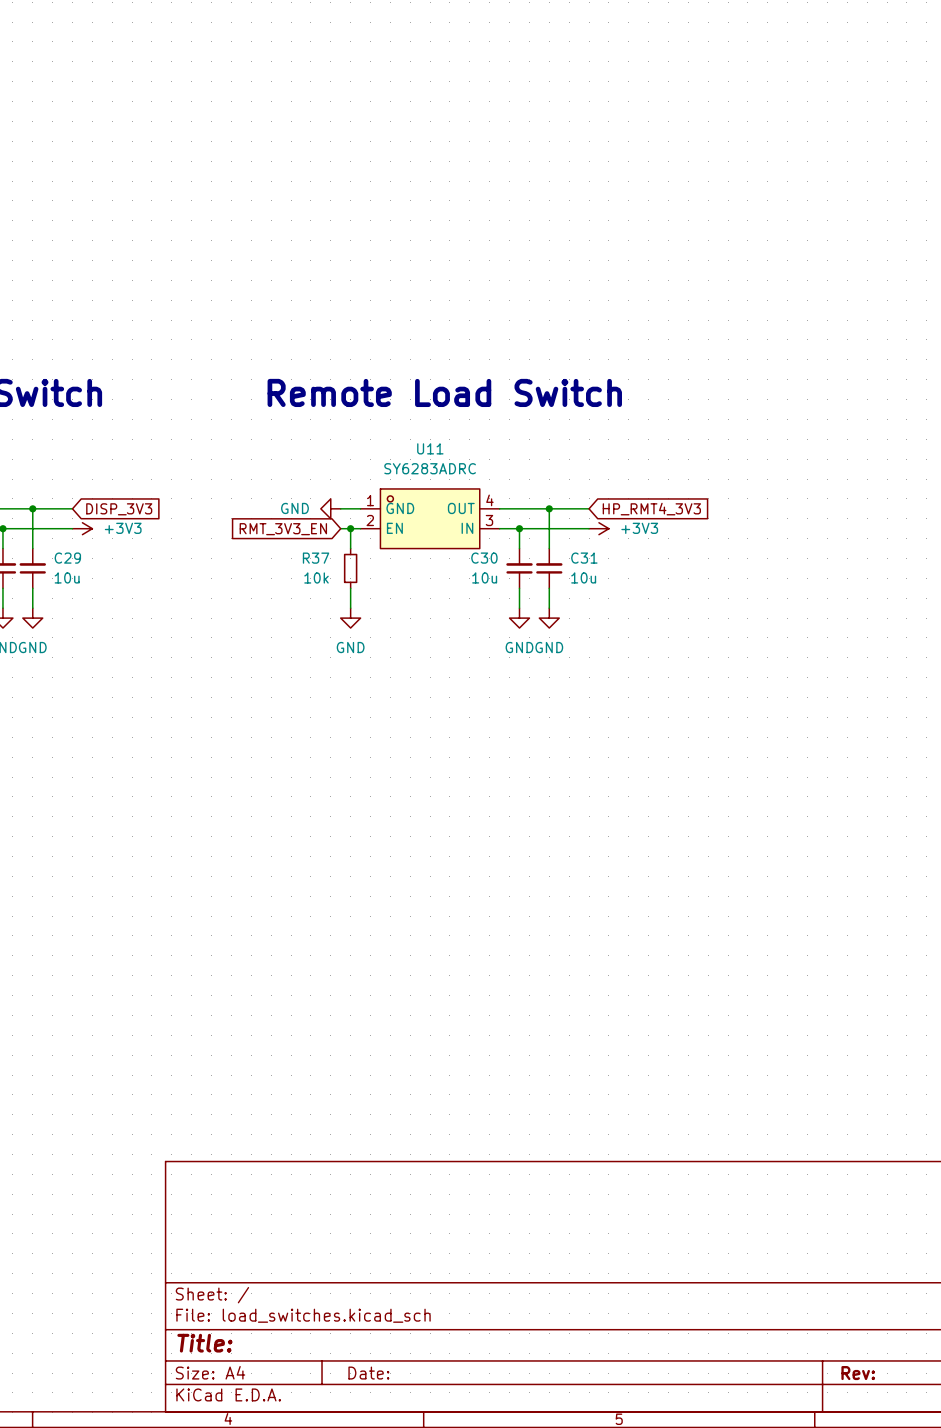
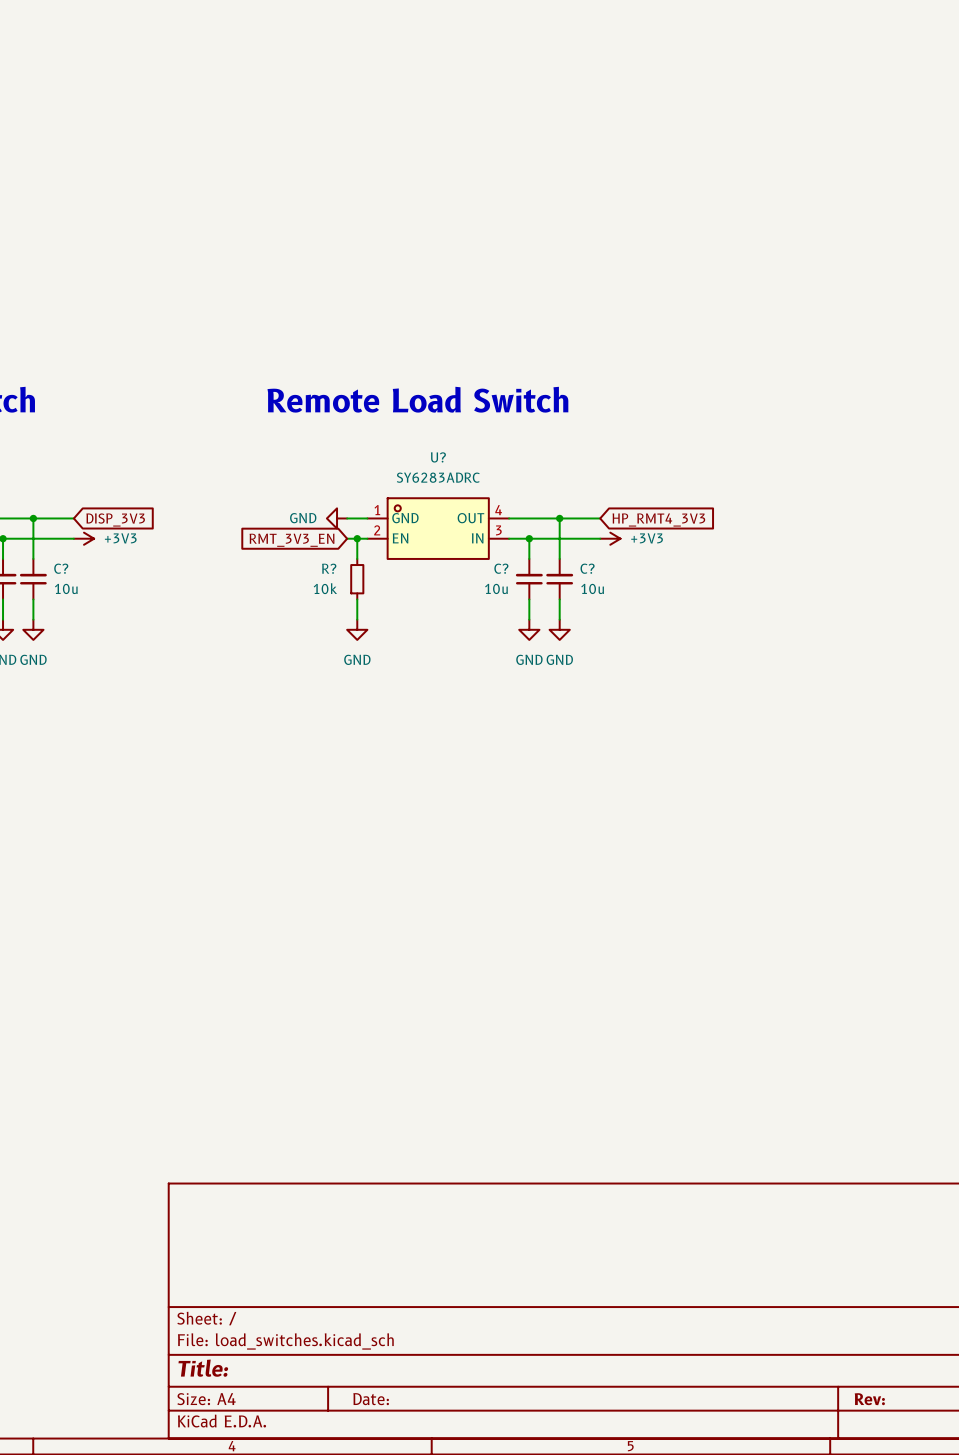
U11 name: U11 (430, 448) -> U? (438, 457)
C29 name: C29 (67, 558) -> C? (61, 568)
R37 name: R37 (316, 558) -> R? (329, 568)
C30 name: C30 (484, 558) -> C? (501, 568)
C31 name: C31 (584, 558) -> C? (587, 568)

